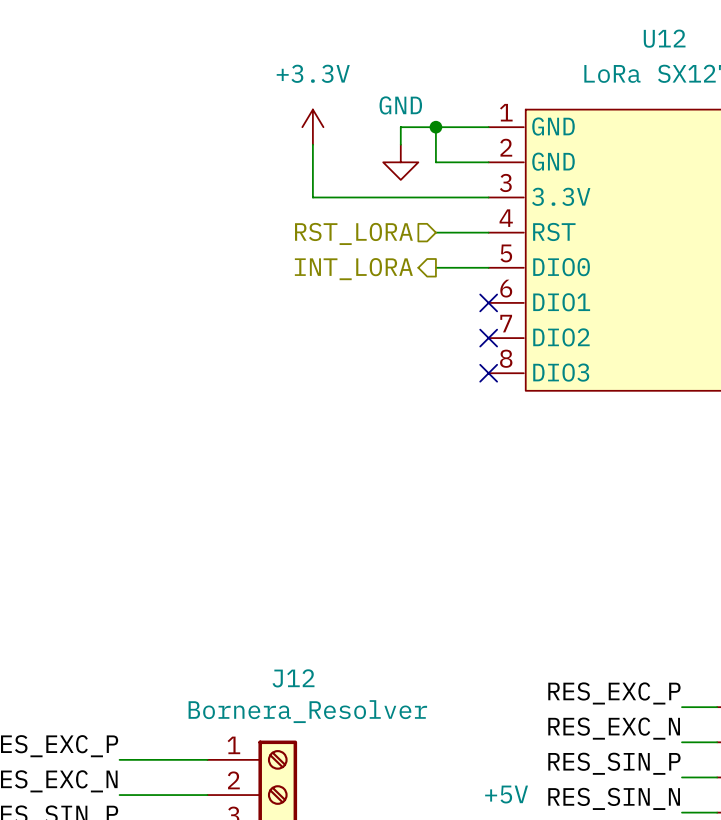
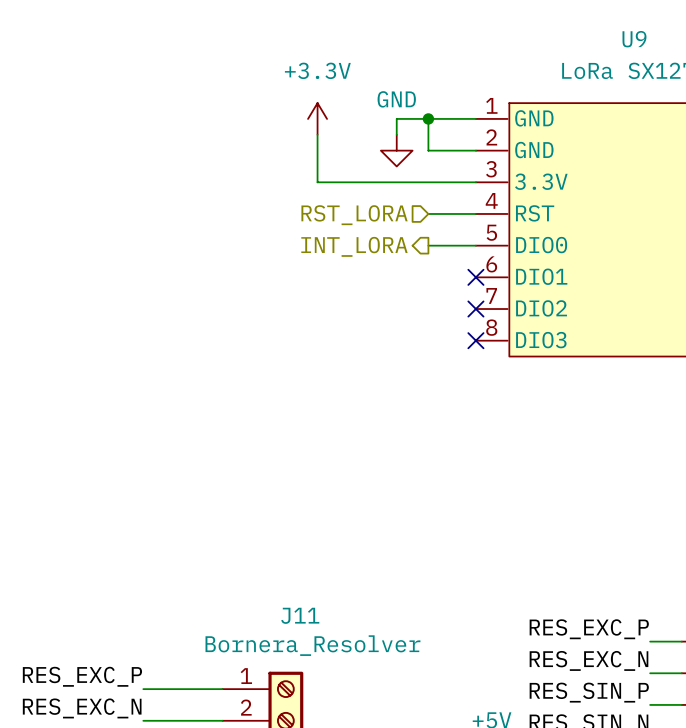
U12 name: U12 (664, 38) -> U9 (634, 39)
J12 name: J12 (293, 678) -> J11 (300, 615)

